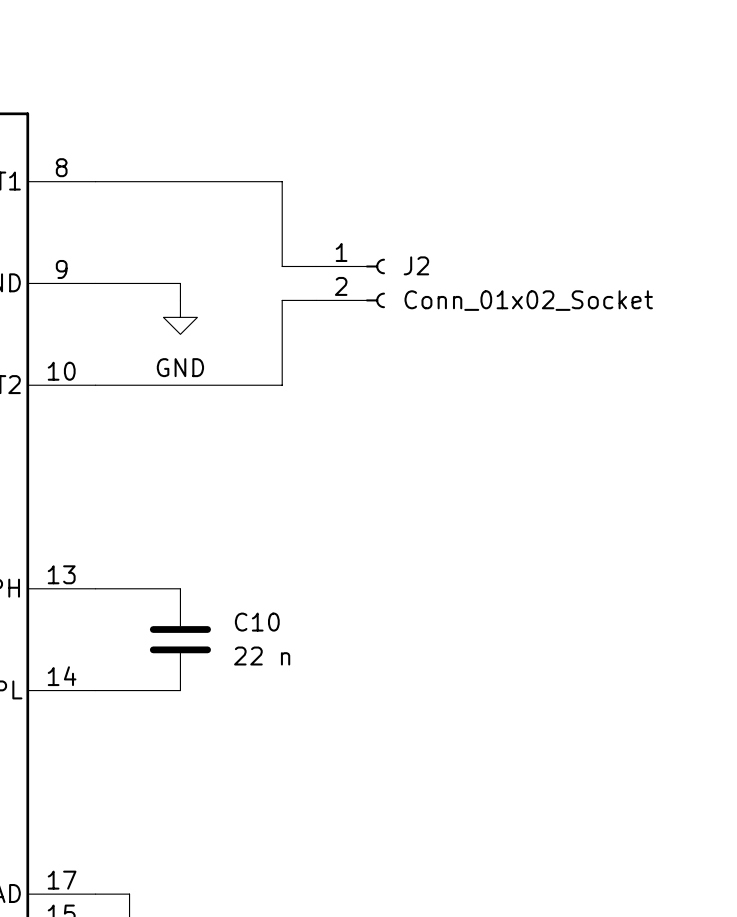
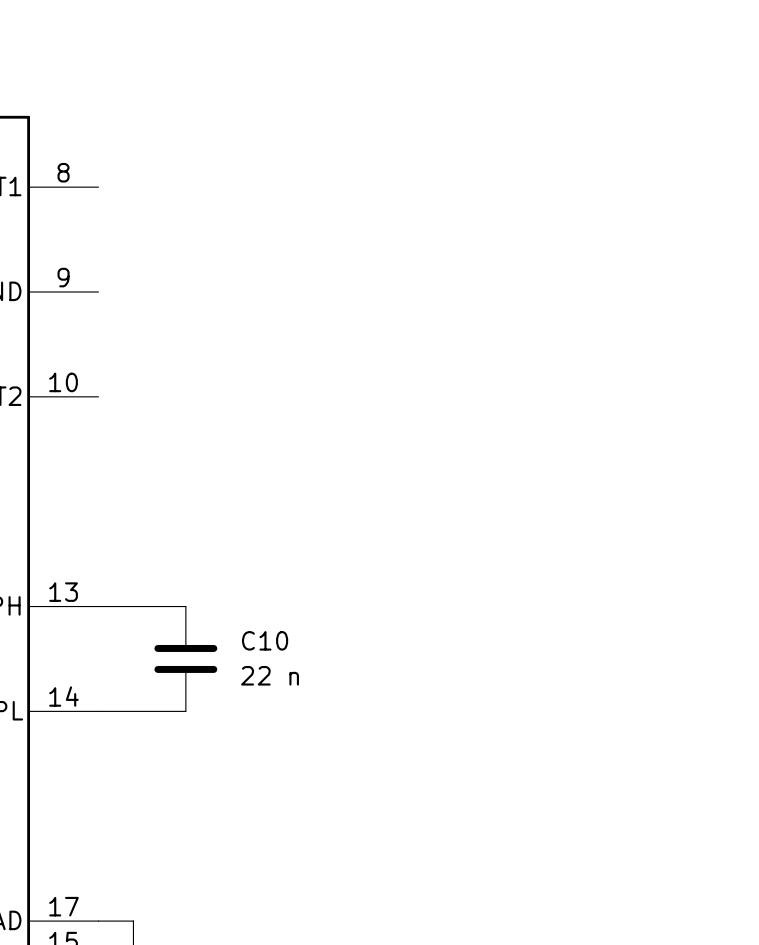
wire: (95, 181) (282, 181) (282, 266) (316, 266) -> none
wire: (95, 283) (180, 283) (180, 300) -> none
J2: Conn_01x02_Socket (350, 283) -> none
wire: (316, 300) (282, 300) (282, 385) (95, 385) -> none
power symbol: GND (180, 317) -> none

